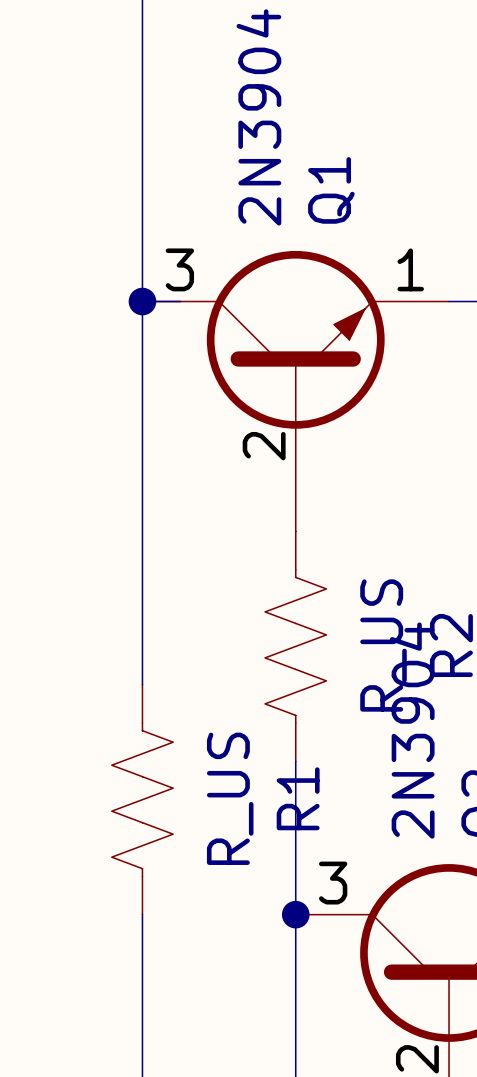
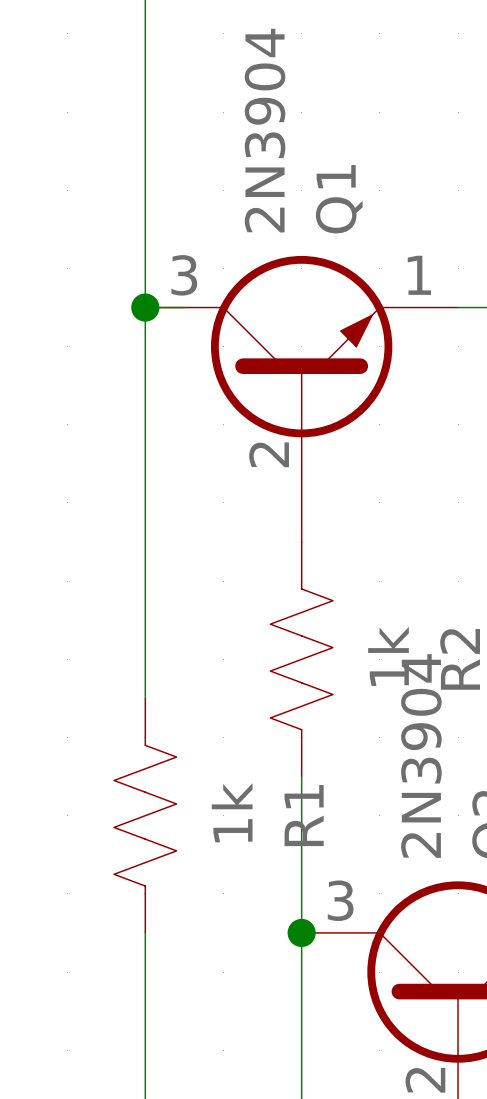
R2 value: R_US (383, 645) -> 1k (388, 656)
R1 value: R_US (230, 798) -> 1k (232, 812)

